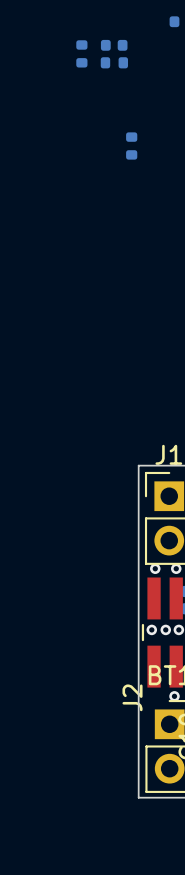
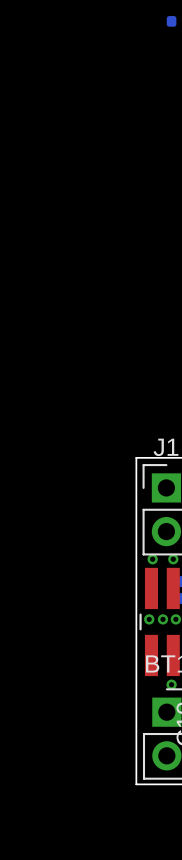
part: (114, 45) -> none
part: (81, 53) -> none
part: (114, 62) -> none
part: (131, 145) -> none
J2 name: J2 (132, 697) -> none

